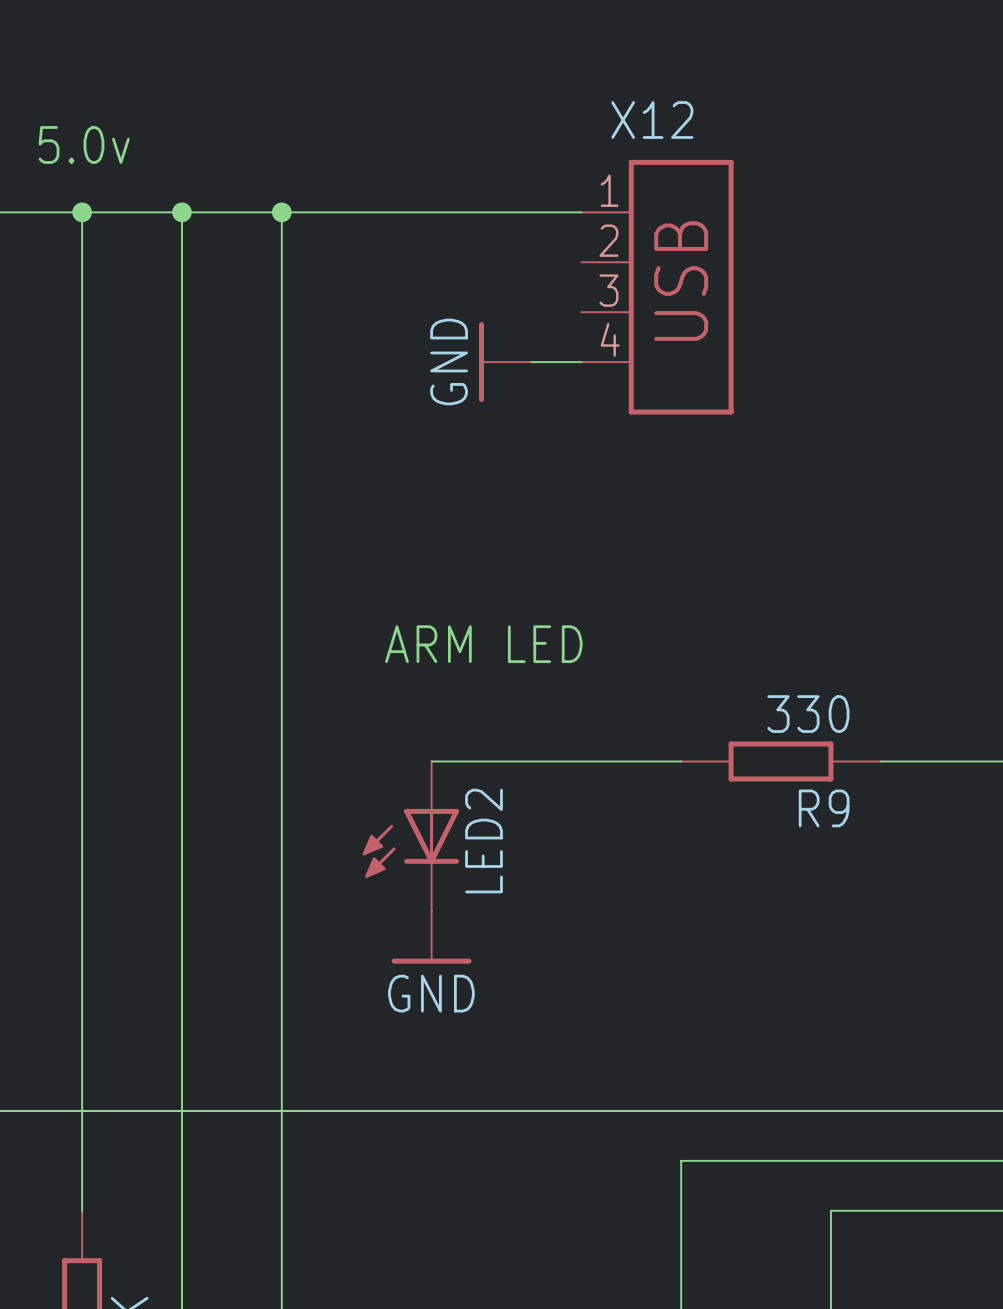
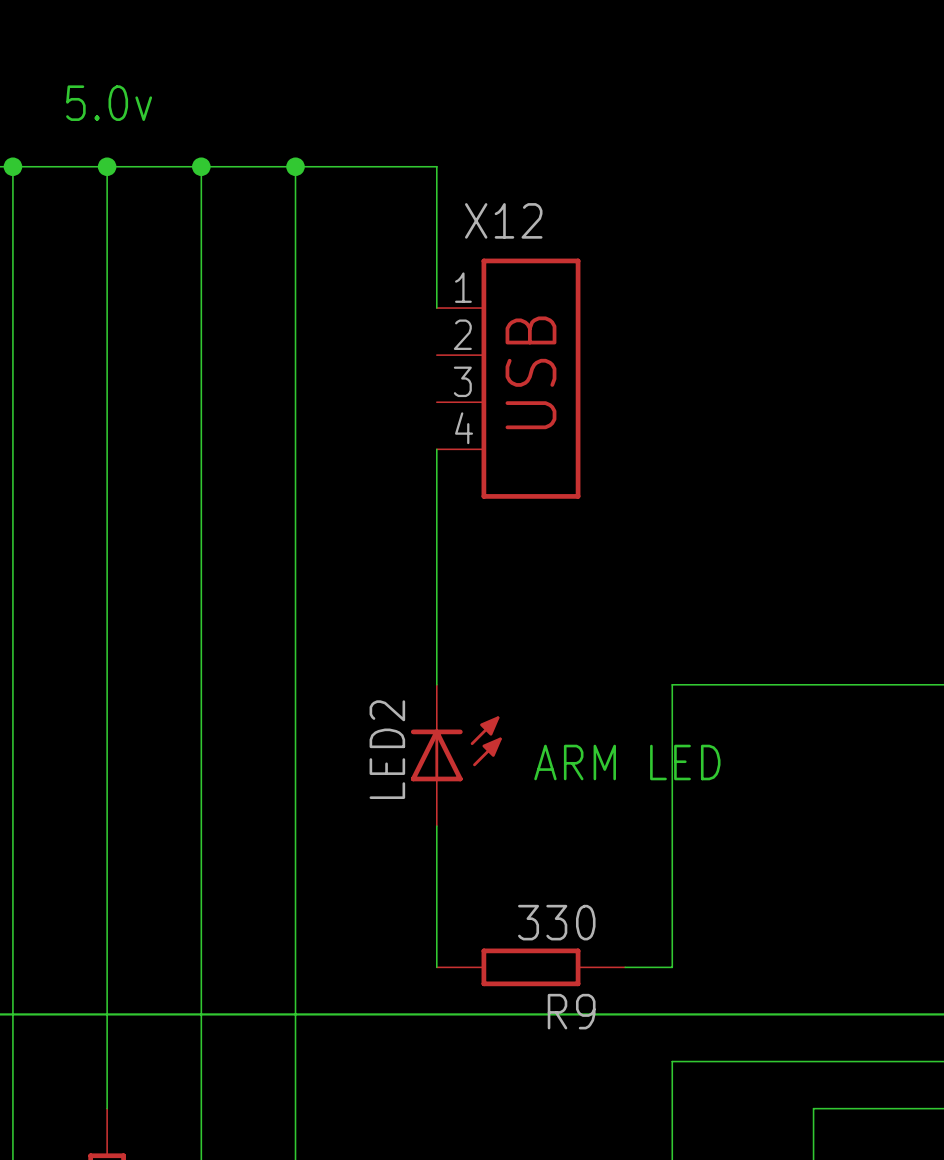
wire: (431, 212) (581, 212) -> (436, 166) (436, 308)
X12 position: (657, 287) -> (508, 378)
power symbol: GND (505, 362) -> none
wire: (531, 362) (581, 362) -> none
text position: ARM LED (483, 644) -> ARM LED (627, 762)
wire: (431, 761) (681, 761) -> (436, 684) (436, 449)
R9 position: (781, 761) -> (530, 967)
wire: none -> (860, 684) (672, 684) (672, 967) (625, 967)
LED2 rotation: 0° (410, 843) -> 180° (456, 748)
wire: none -> (436, 826) (436, 967)
power symbol: GND (431, 937) -> none

